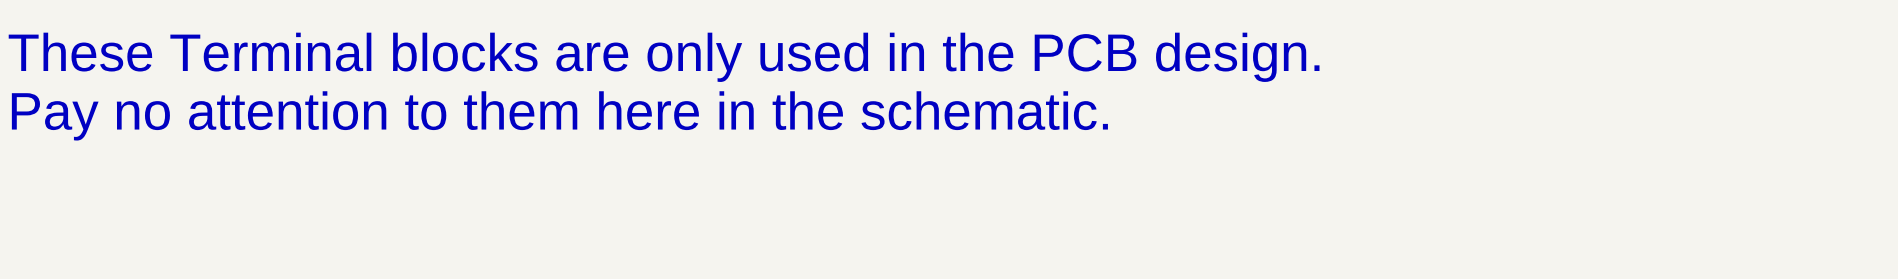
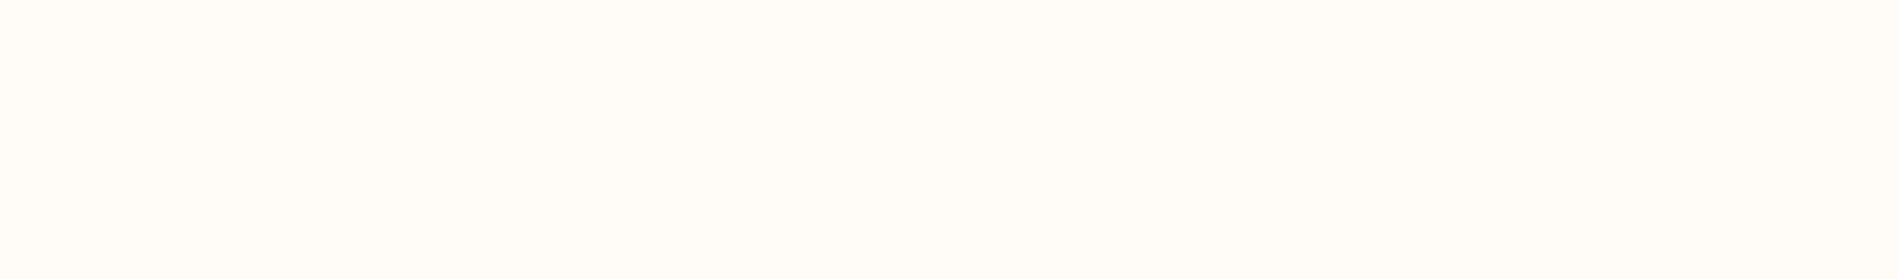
text: These Terminal blocks are only used in the PCB design. (664, 57) -> none
text: Pay no attention to them here in the schematic. (559, 115) -> none

